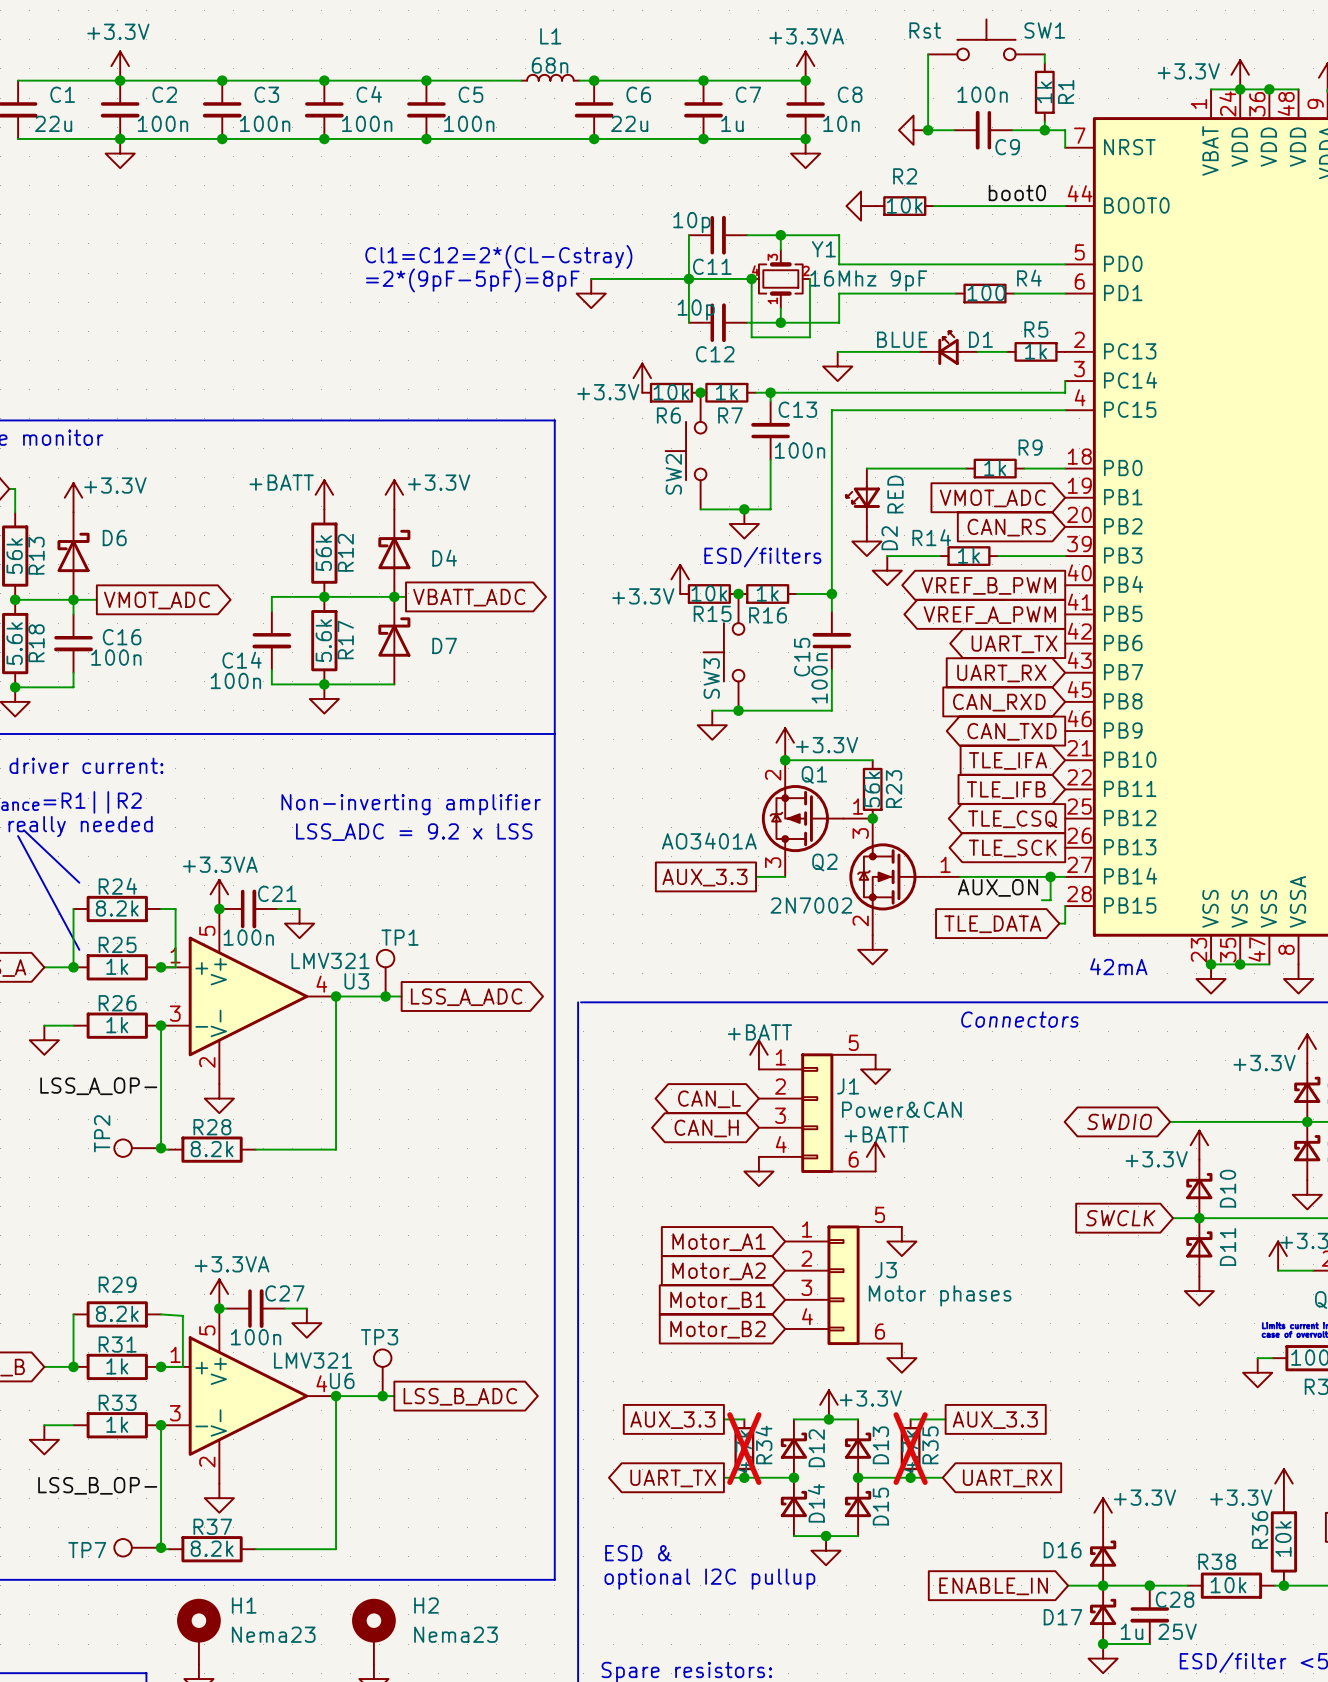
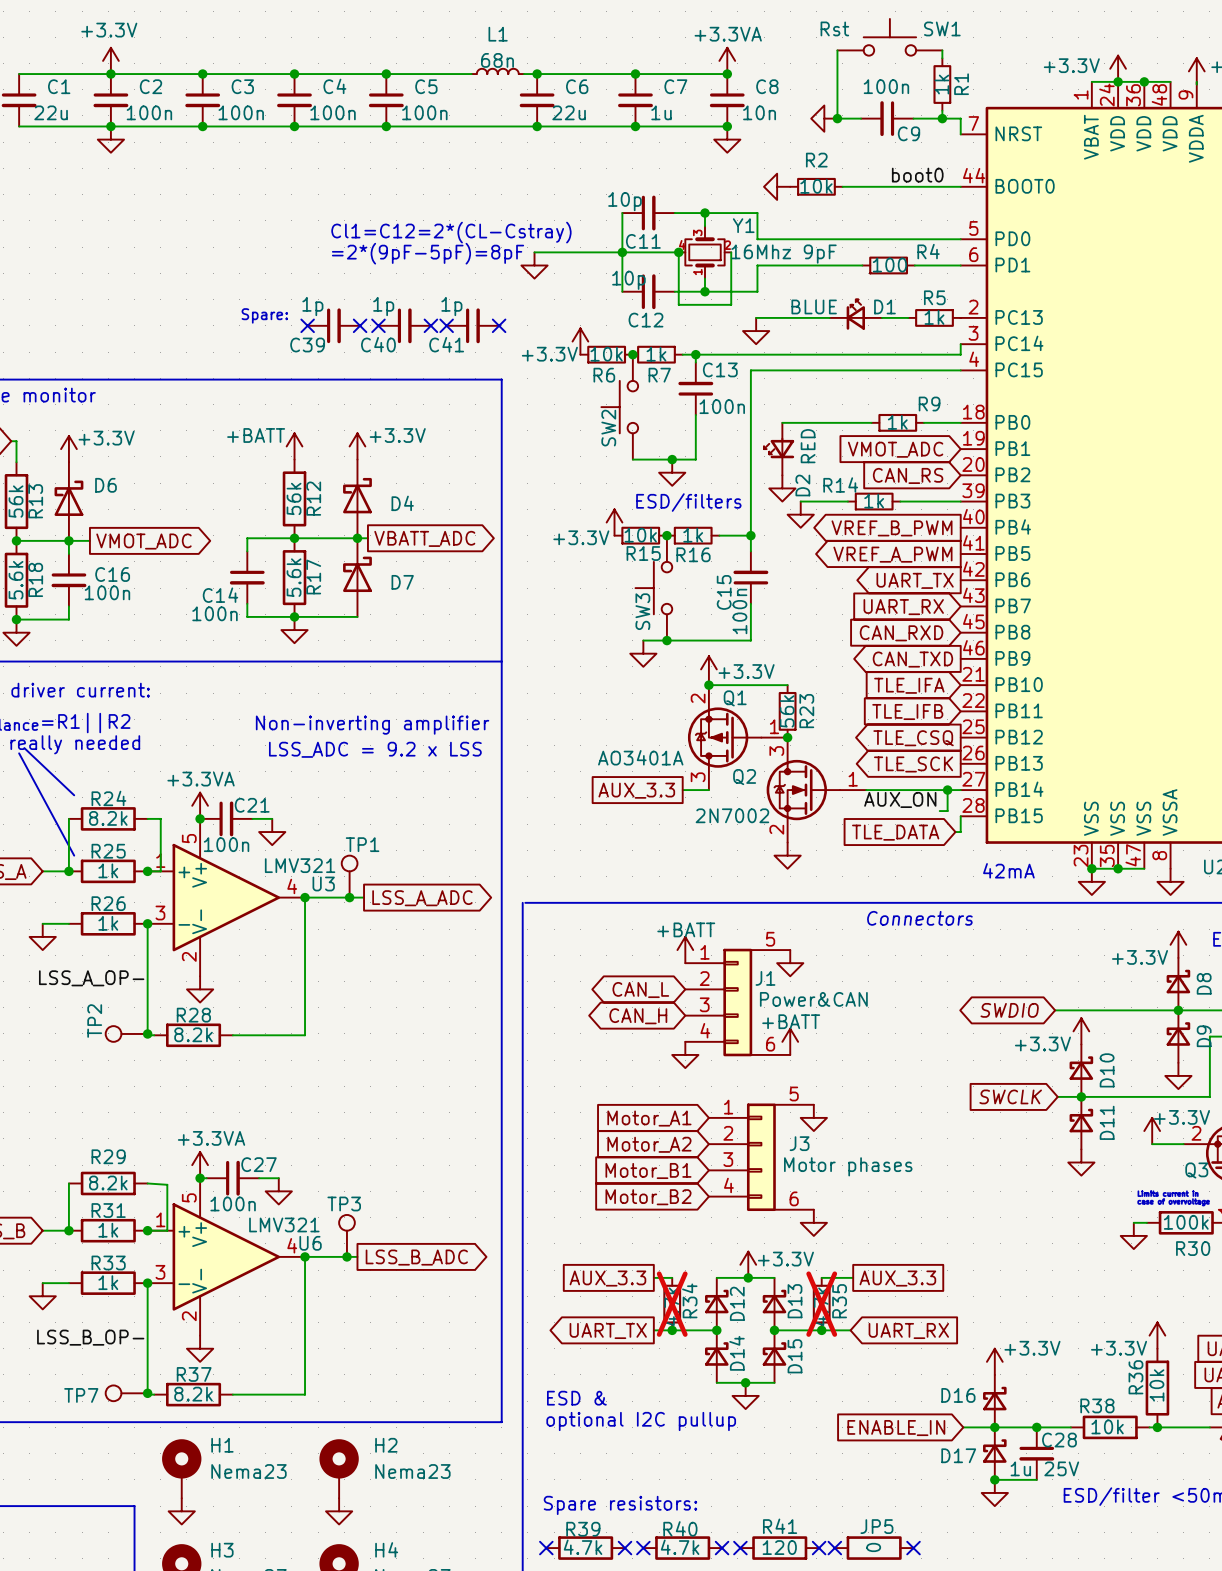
text: none -> Spare: (264, 315)
no-connect mark: none -> (307, 325)
C39: none -> 1p (333, 325)
no-connect mark: none -> (360, 325)
no-connect mark: none -> (378, 325)
C40: none -> 1p (404, 325)
no-connect mark: none -> (430, 325)
no-connect mark: none -> (446, 325)
C41: none -> 1p (472, 325)
no-connect mark: none -> (499, 325)

